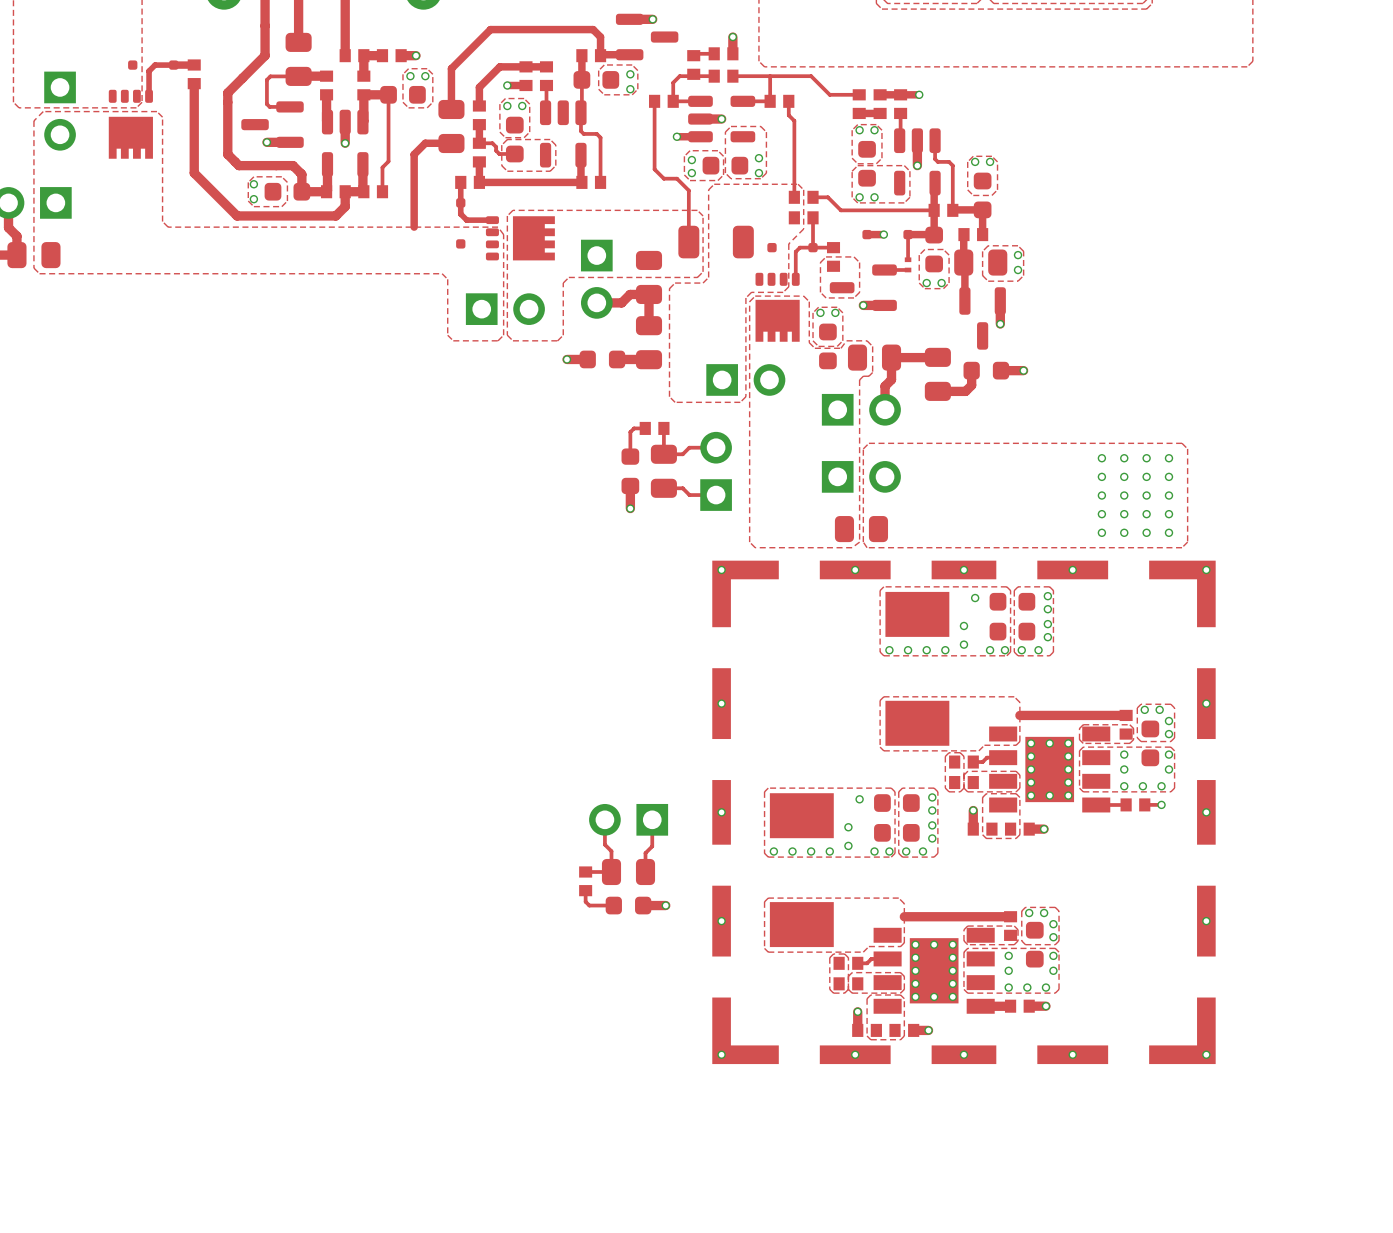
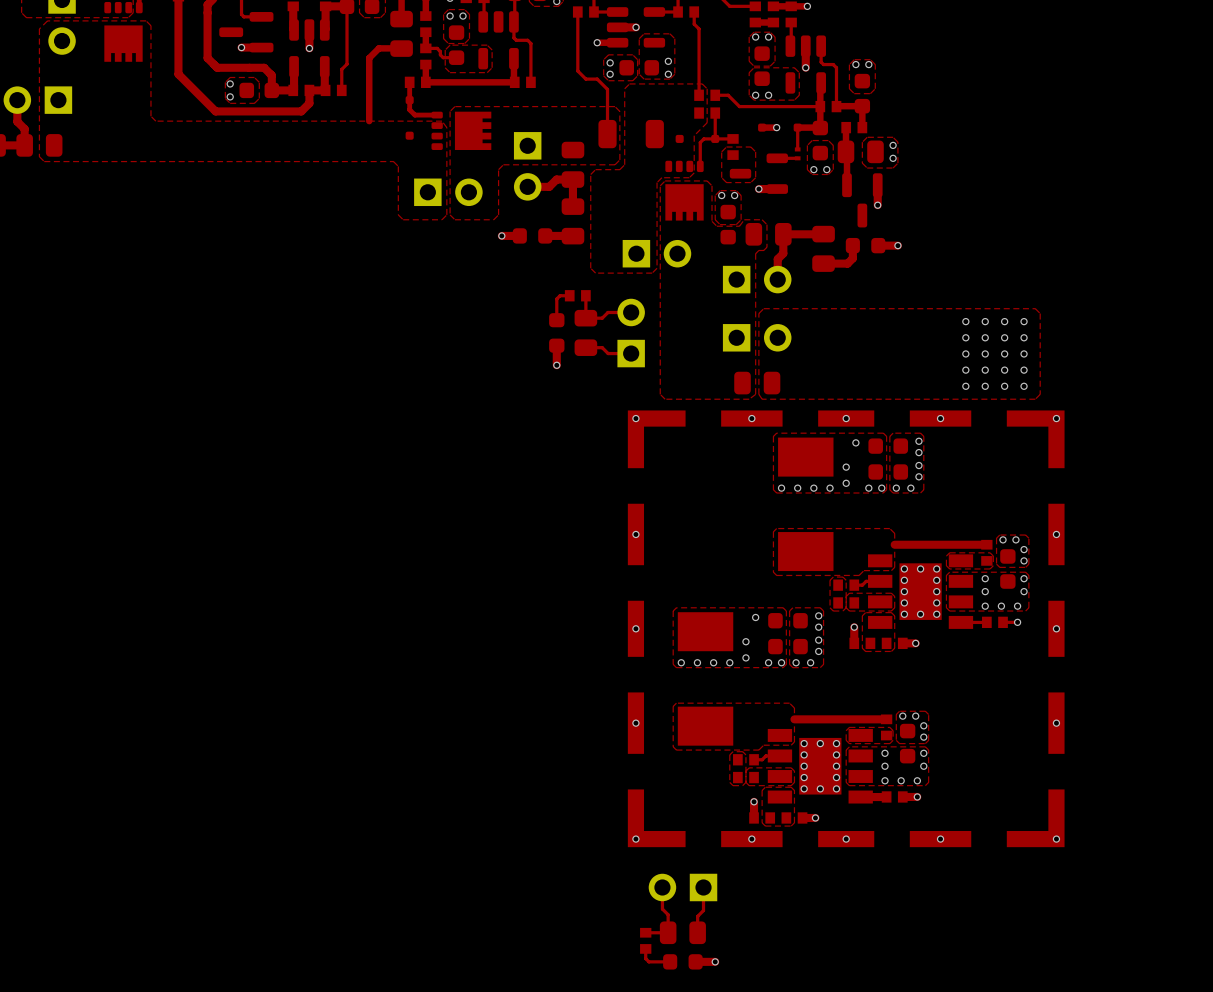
top track: (604, 819) (604, 844) (611, 851) (611, 872) (585, 872) -> (662, 887) (662, 909) (668, 914) (668, 932) (645, 932)
part position: (628, 819) -> (682, 887)
top track: (652, 819) (652, 846) (645, 853) (645, 872) -> (703, 887) (703, 910) (697, 916) (697, 932)
part position: (628, 872) -> (682, 932)
part position: (585, 881) -> (645, 940)
top track: (585, 890) (585, 901) (589, 905) (613, 905) -> (645, 948) (645, 958) (648, 961) (670, 961)
part position: (628, 905) -> (682, 961)
top track: (665, 905) (643, 905) -> (715, 961) (695, 961)
via: (665, 905) -> none
via: none -> (715, 961)

